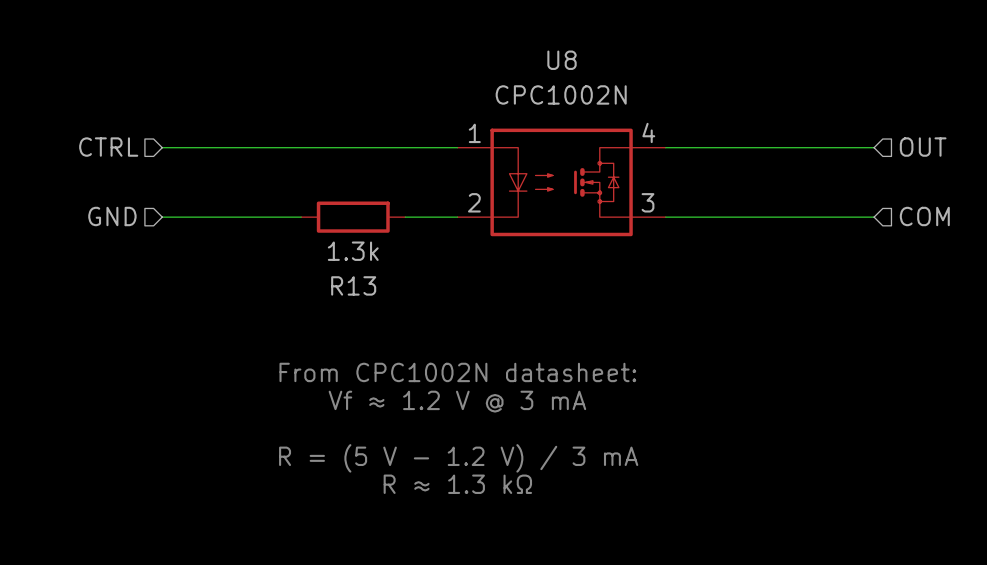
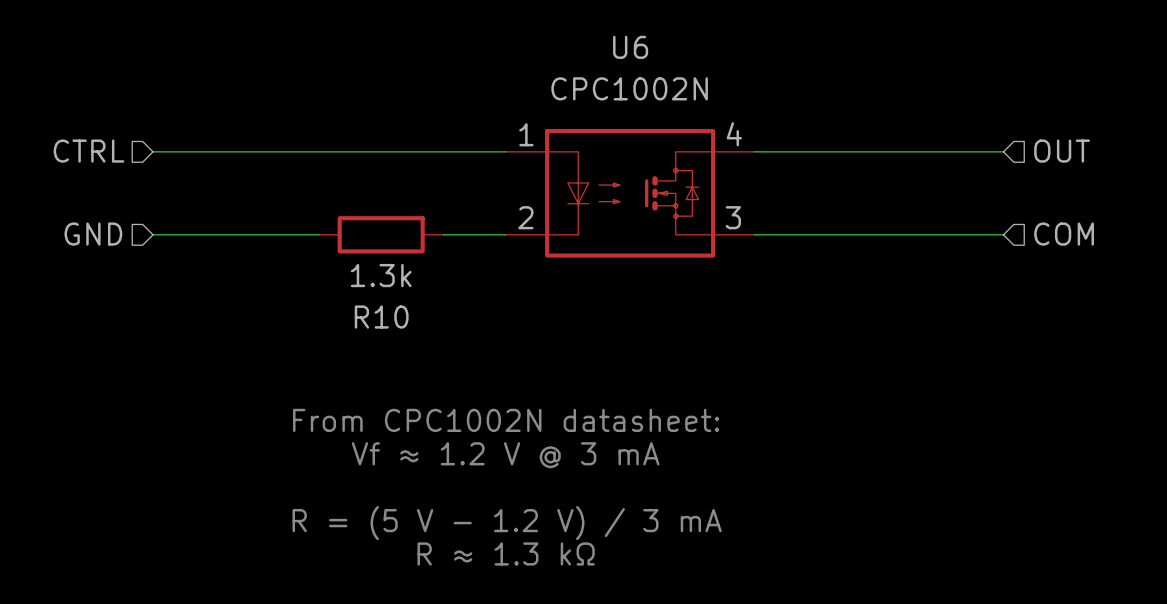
U8 name: U8 (562, 60) -> U6 (630, 47)
R13 name: R13 (353, 285) -> R10 (381, 317)

